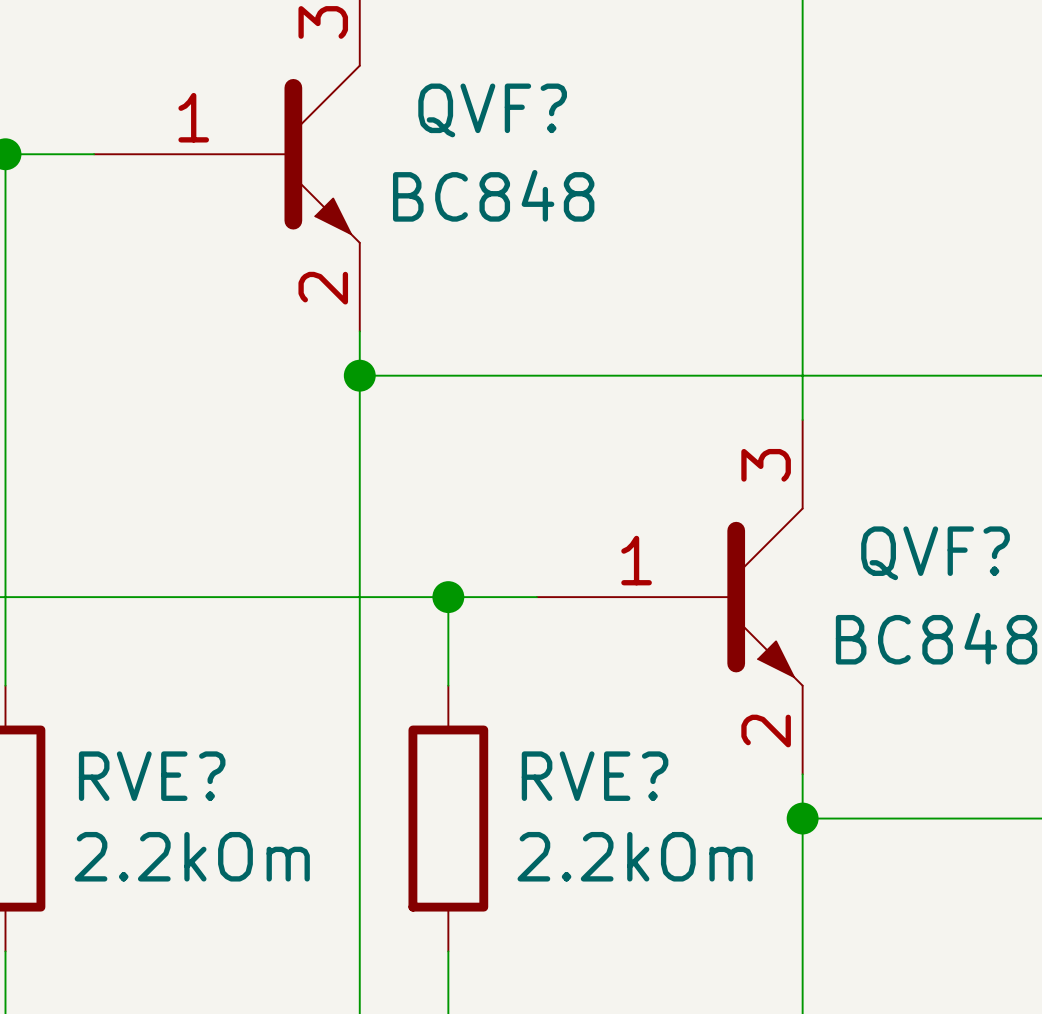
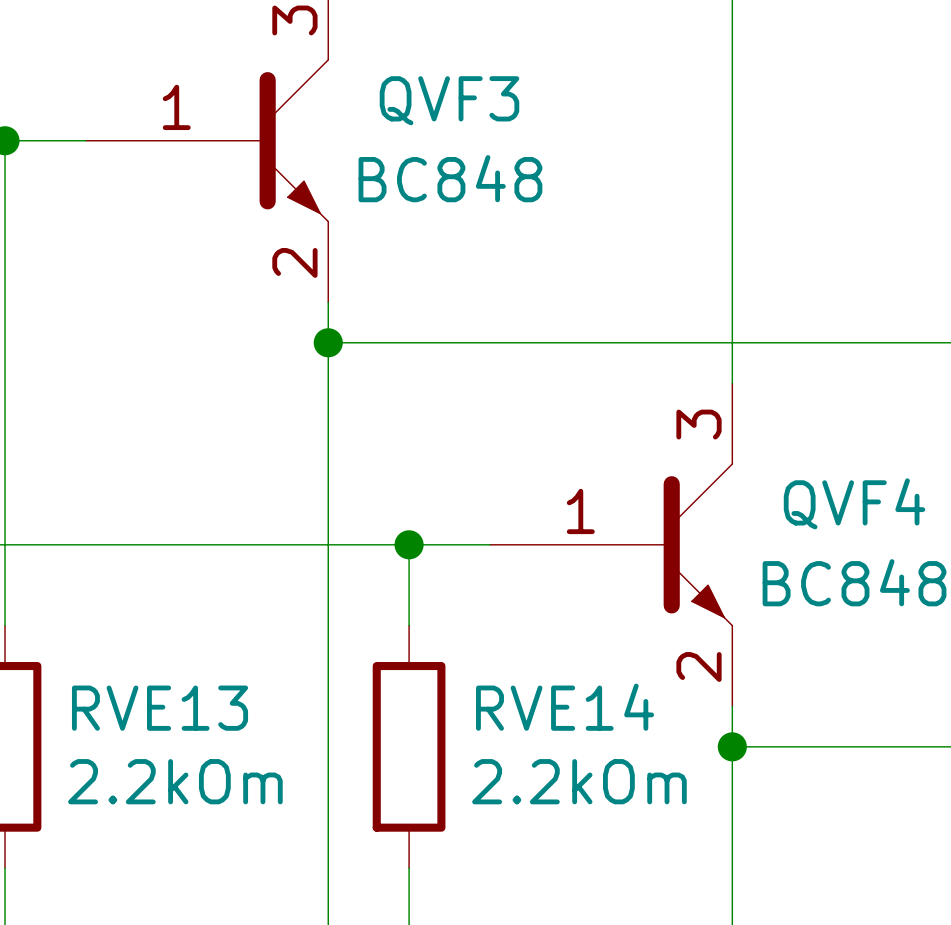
QVF? name: QVF? (492, 110) -> QVF3 (449, 100)
QVF? name: QVF? (935, 553) -> QVF4 (854, 503)
RVE? name: RVE? (152, 776) -> RVE13 (160, 708)
RVE? name: RVE? (595, 776) -> RVE14 (565, 707)

